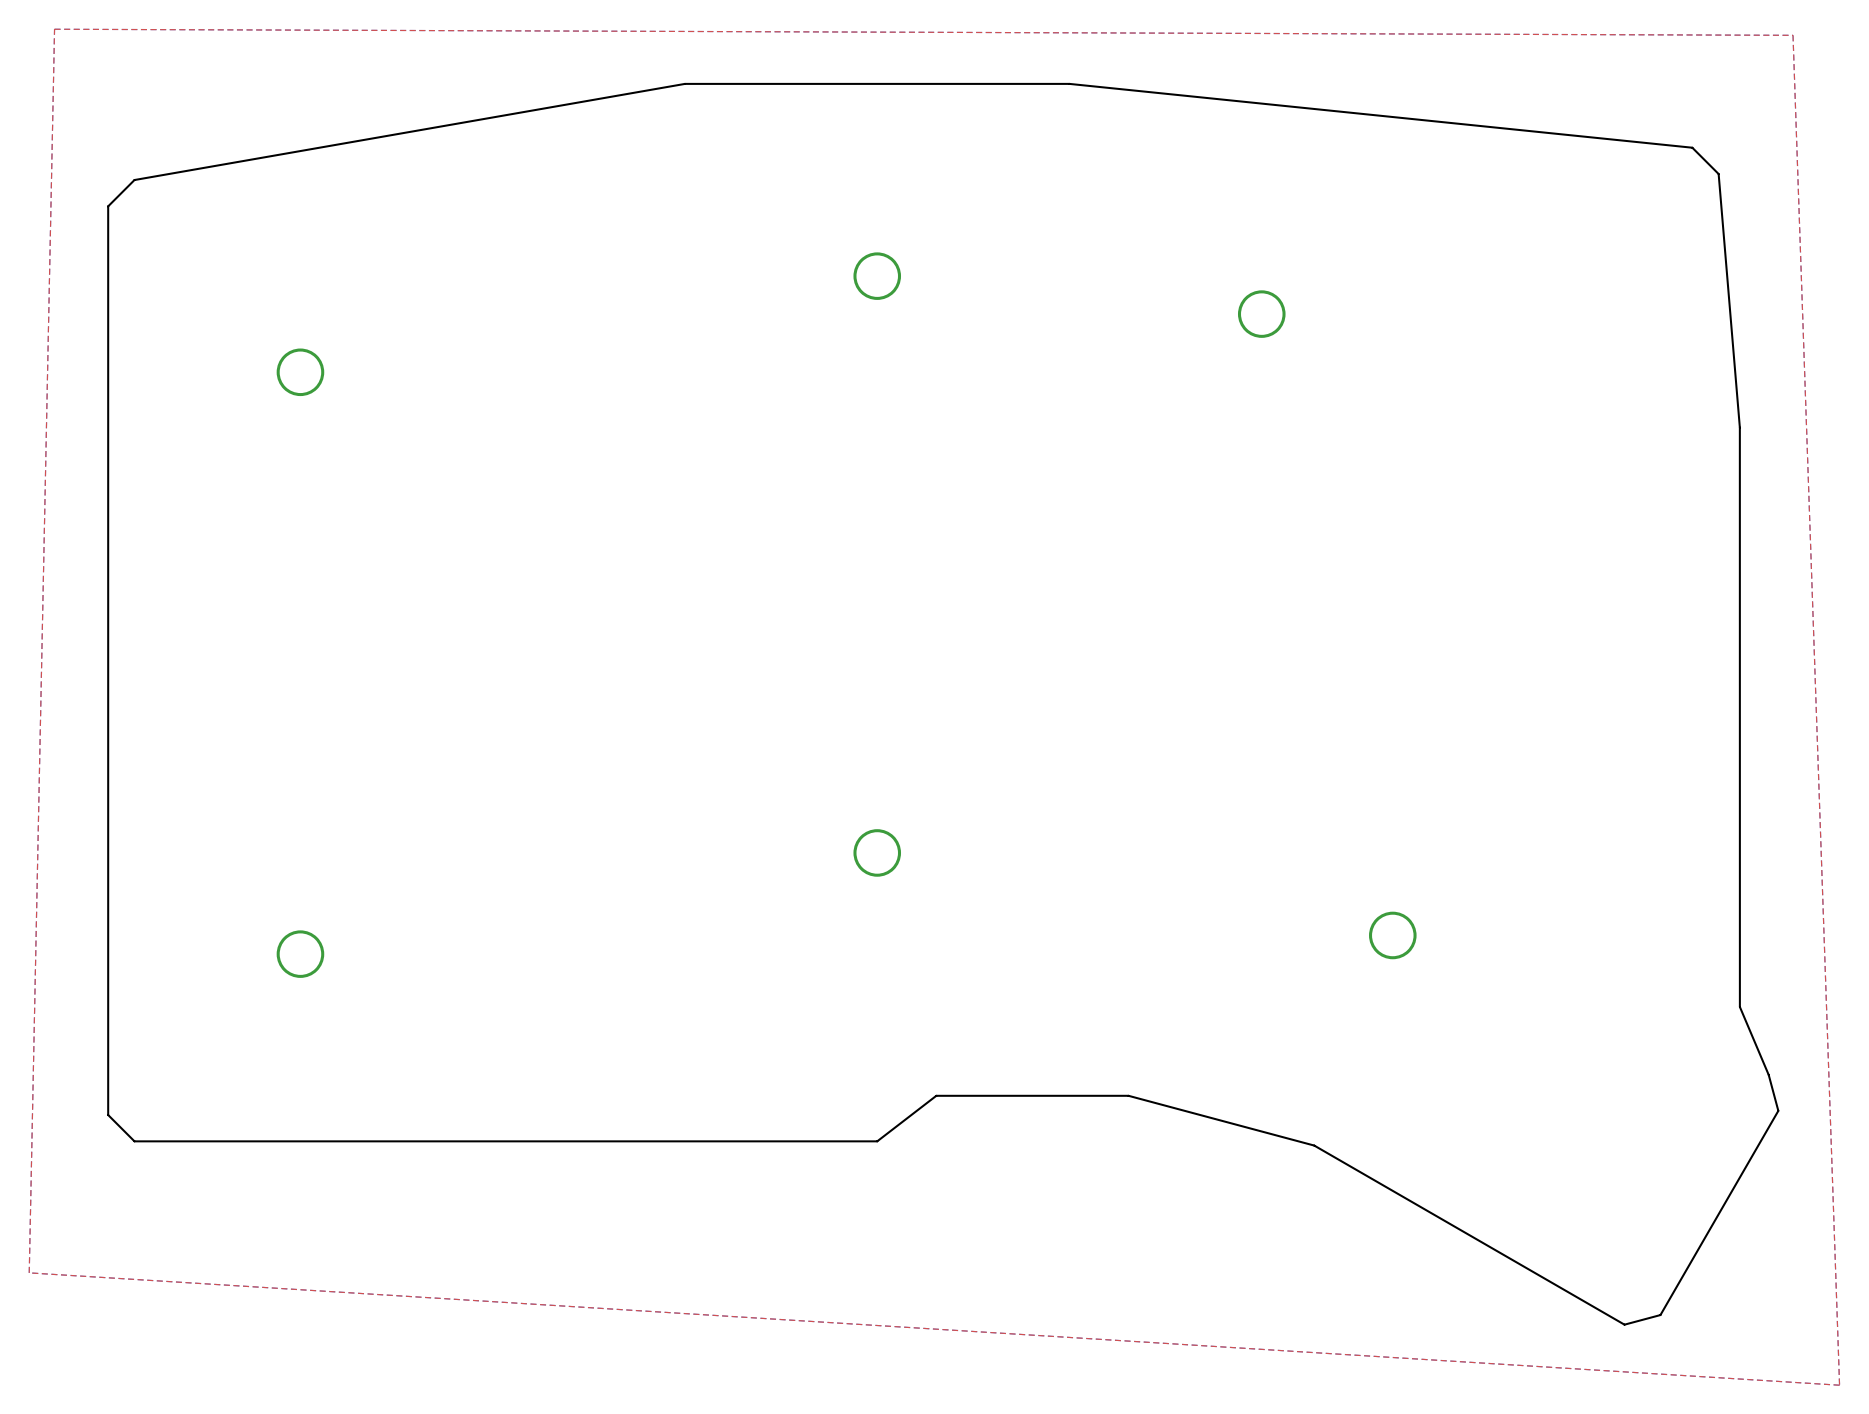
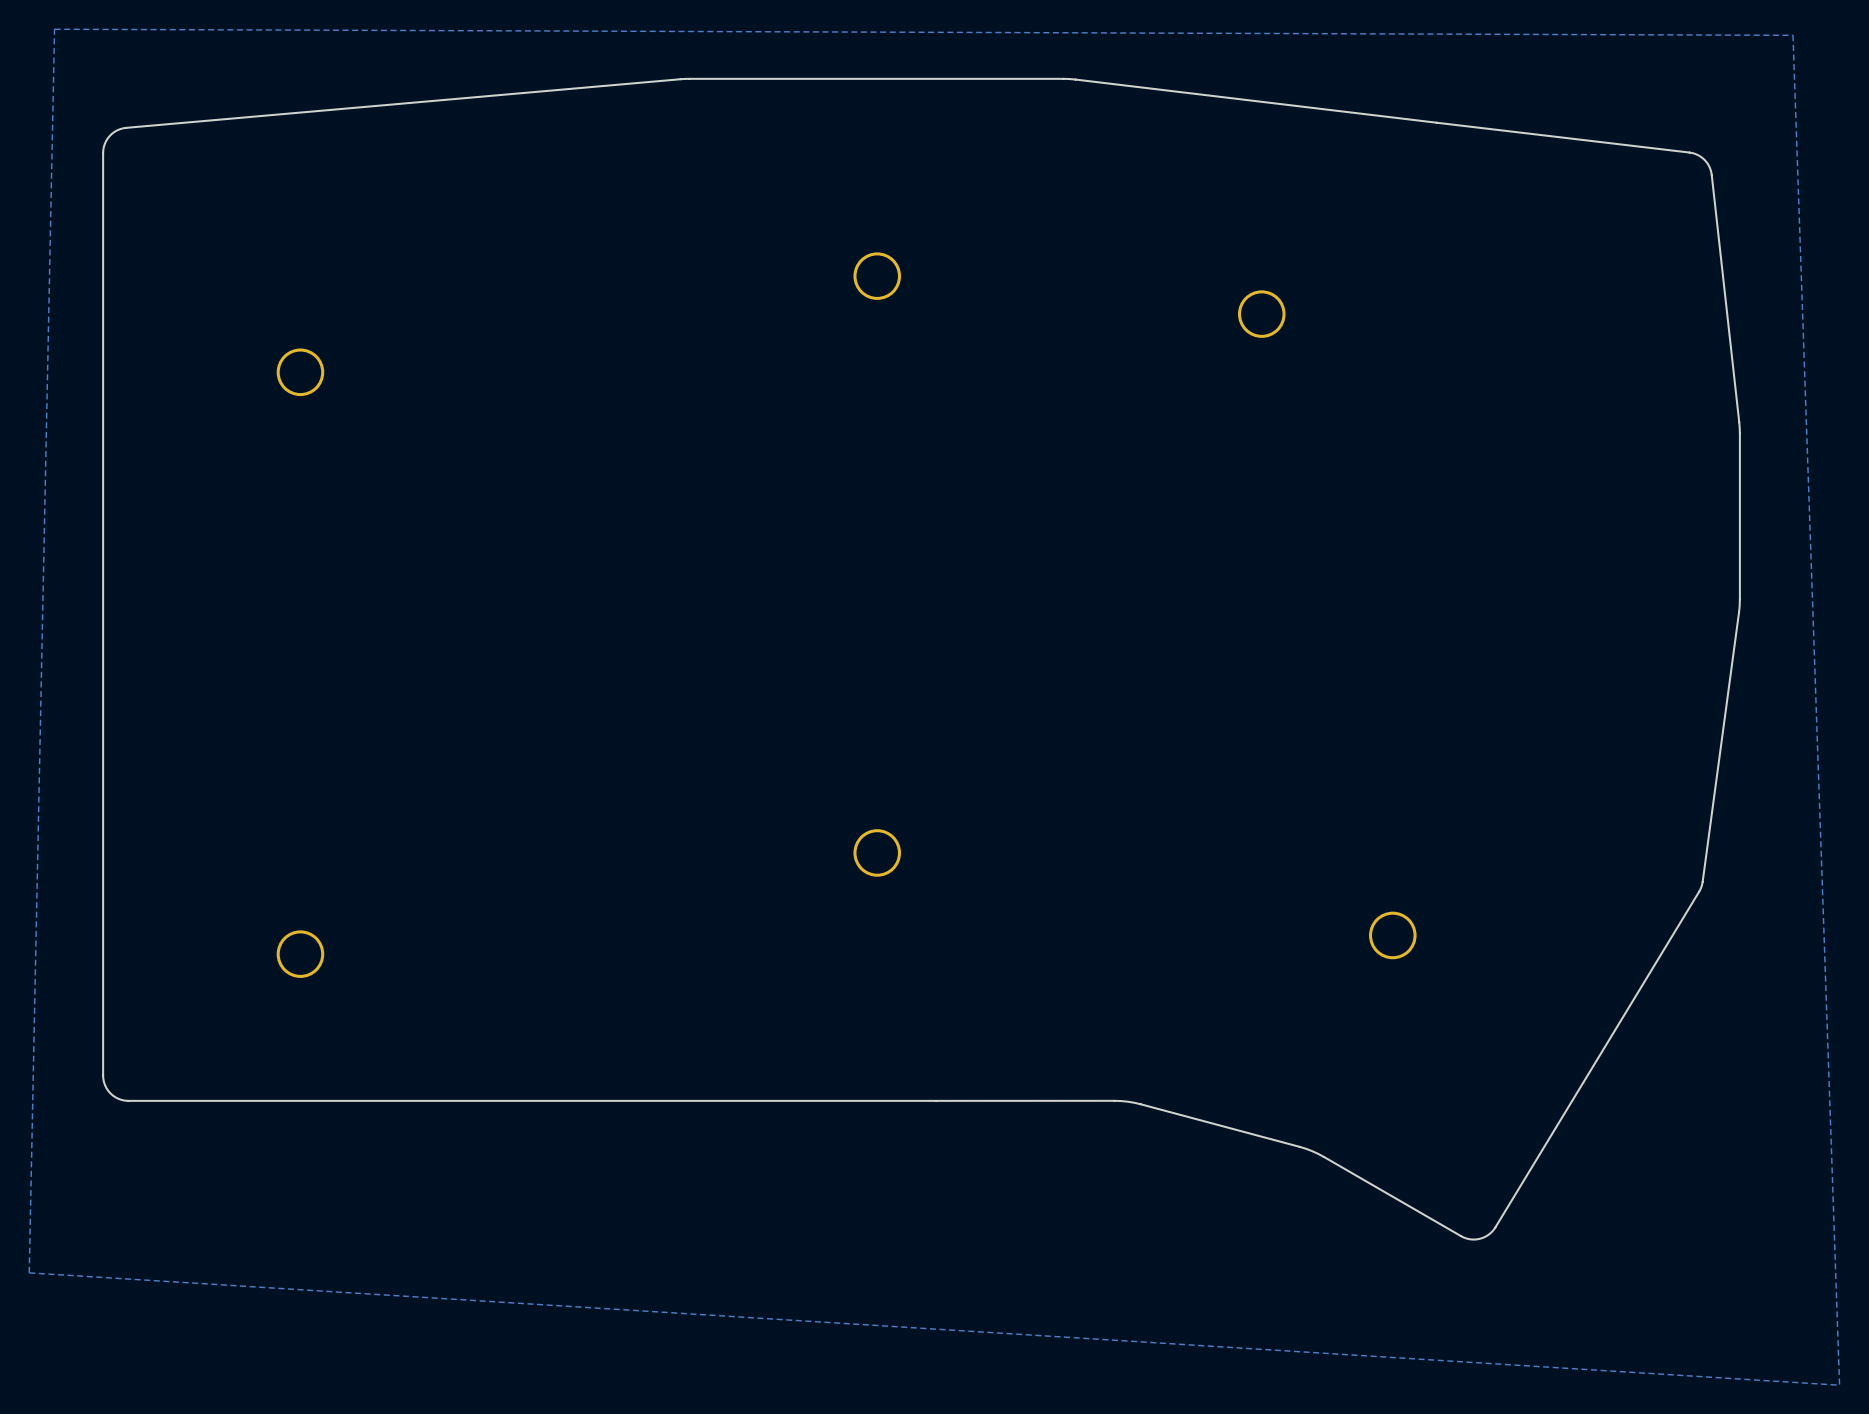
top zone outline: (54, 29) (29, 1272) (1839, 1385) (1793, 35) (54, 29) -> none
board edge: (684, 83) (1069, 83) (1692, 147) (1718, 174) (1739, 427) (1739, 1006) (1768, 1074) (1778, 1110) (1660, 1315) (1624, 1324) (1314, 1145) (1128, 1095) (936, 1095) (877, 1141) (134, 1141) (108, 1115) (108, 206) (134, 180) (684, 83) -> (689, 78) (126, 127) (114, 131) (106, 141) (103, 153) (103, 1075) (108, 1090) (115, 1097) (128, 1100) (1127, 1101) (1305, 1148) (1323, 1156) (1464, 1237) (1476, 1239) (1488, 1234) (1495, 1227) (1702, 884) (1739, 599) (1739, 428) (1711, 174) (1708, 164) (1700, 156) (1689, 152) (1069, 79) (689, 78)

